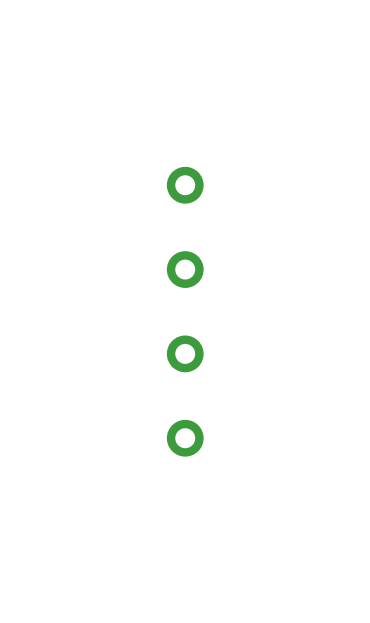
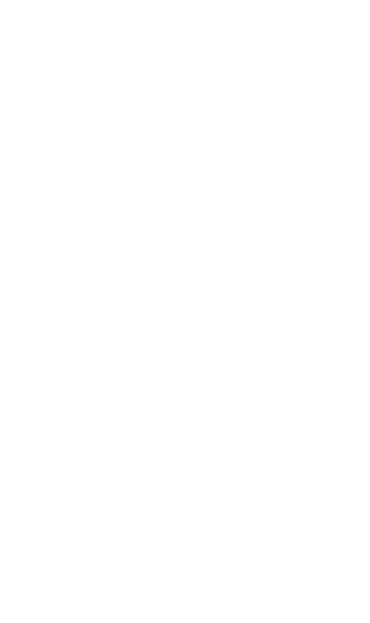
part: (185, 311) -> none

